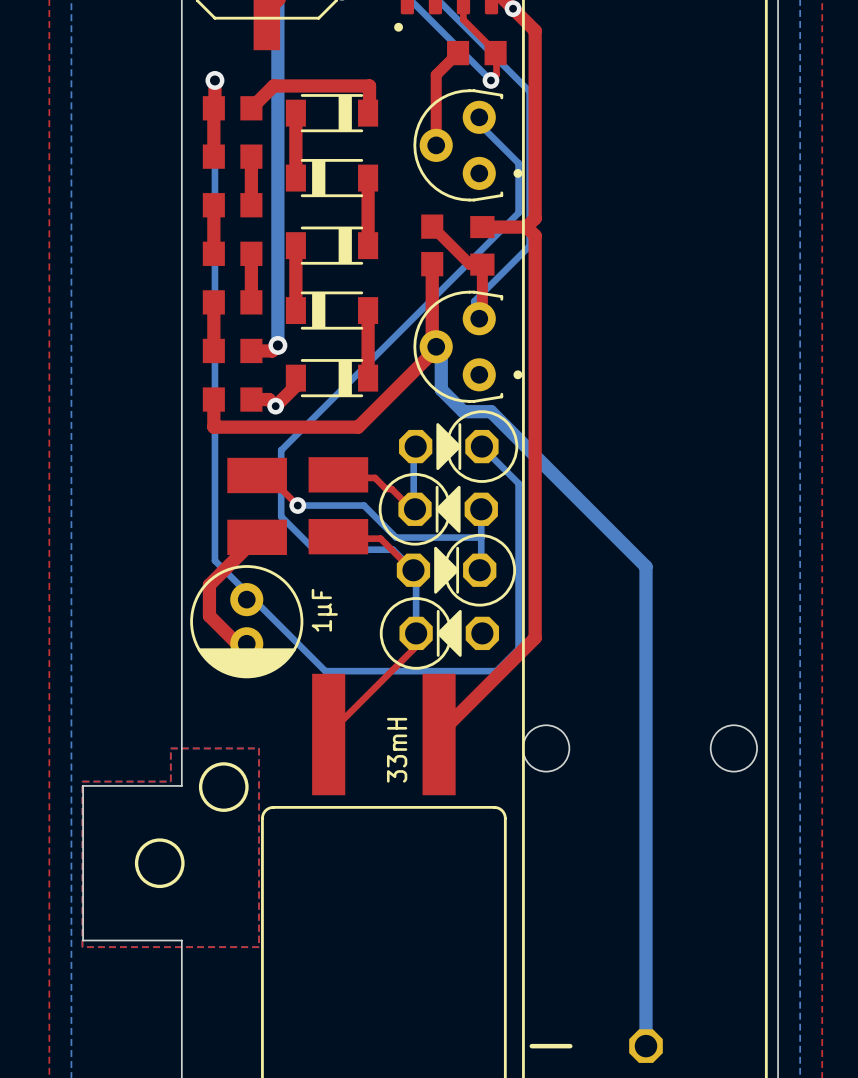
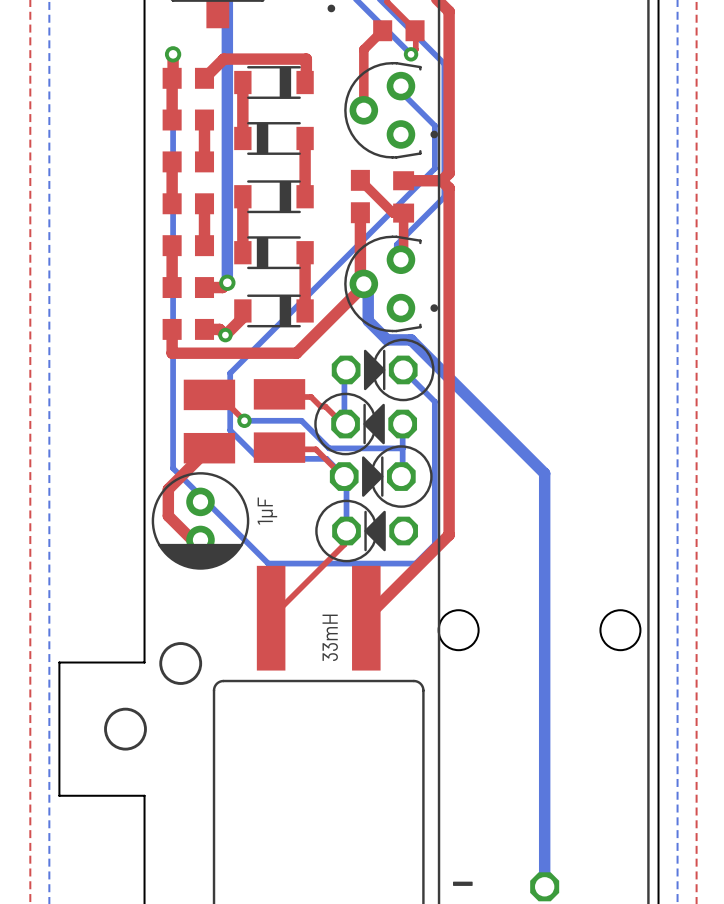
top zone outline: (170, 748) (170, 781) (82, 781) (82, 947) (259, 947) (259, 748) (170, 748) -> none

